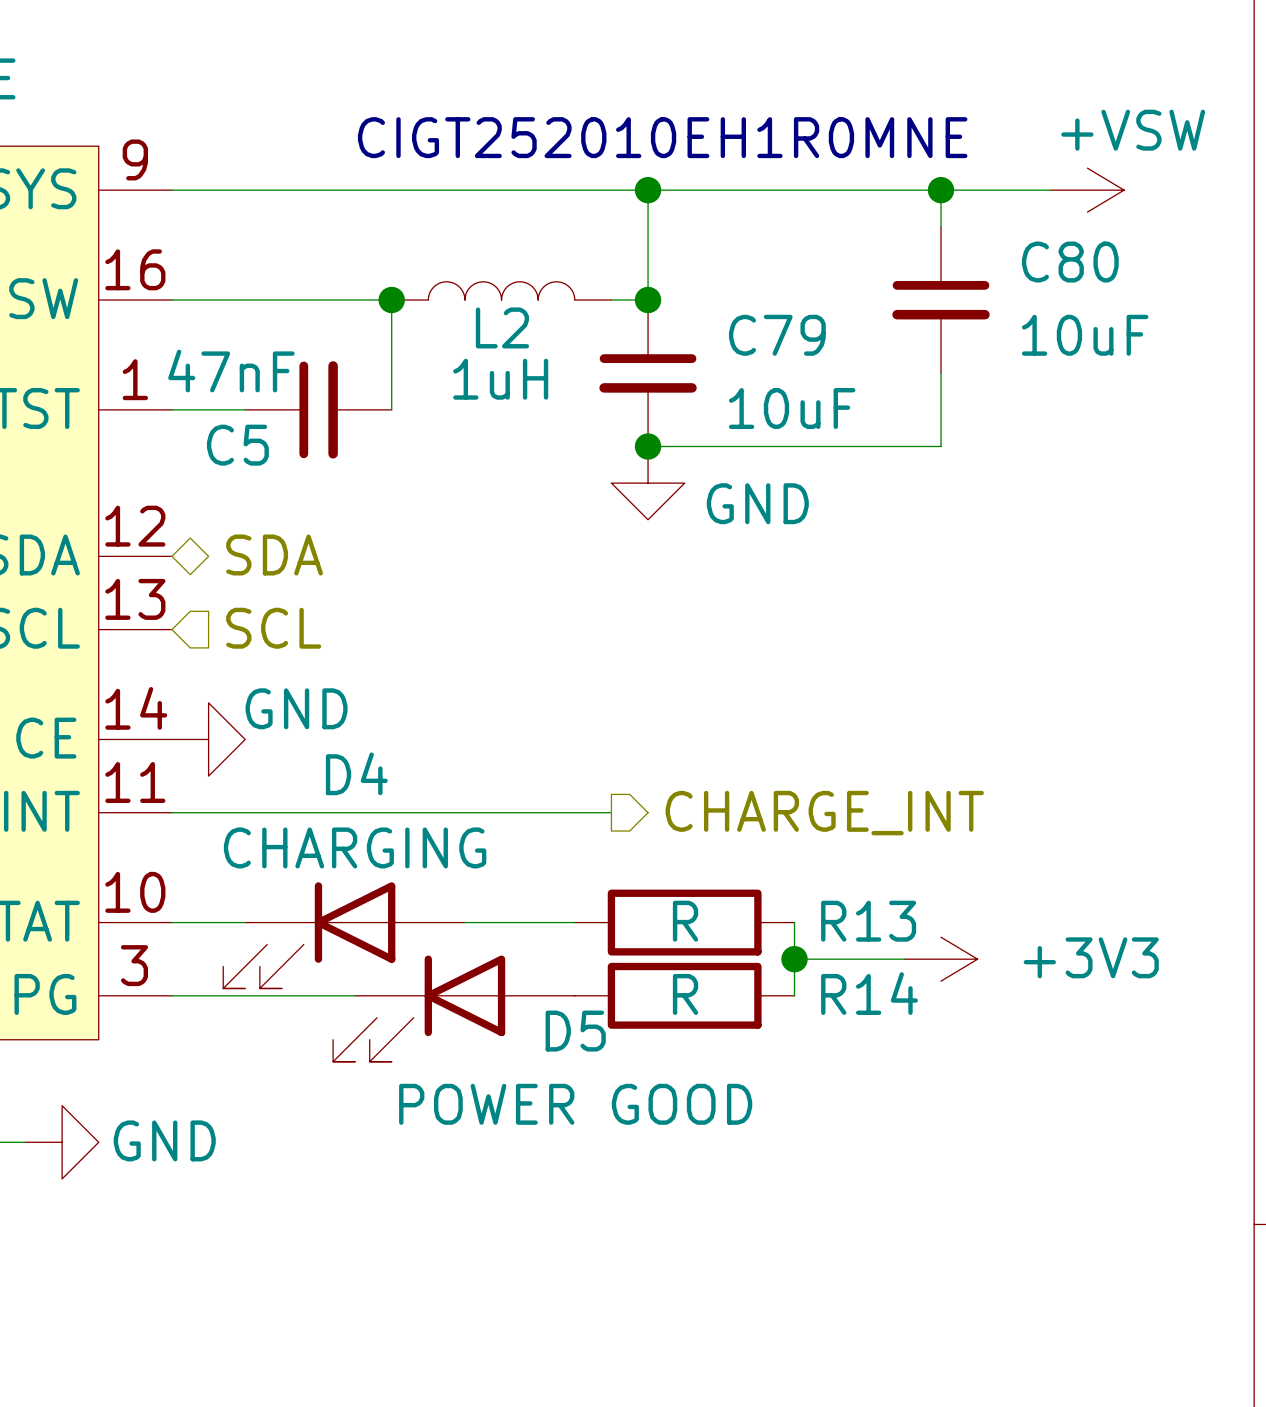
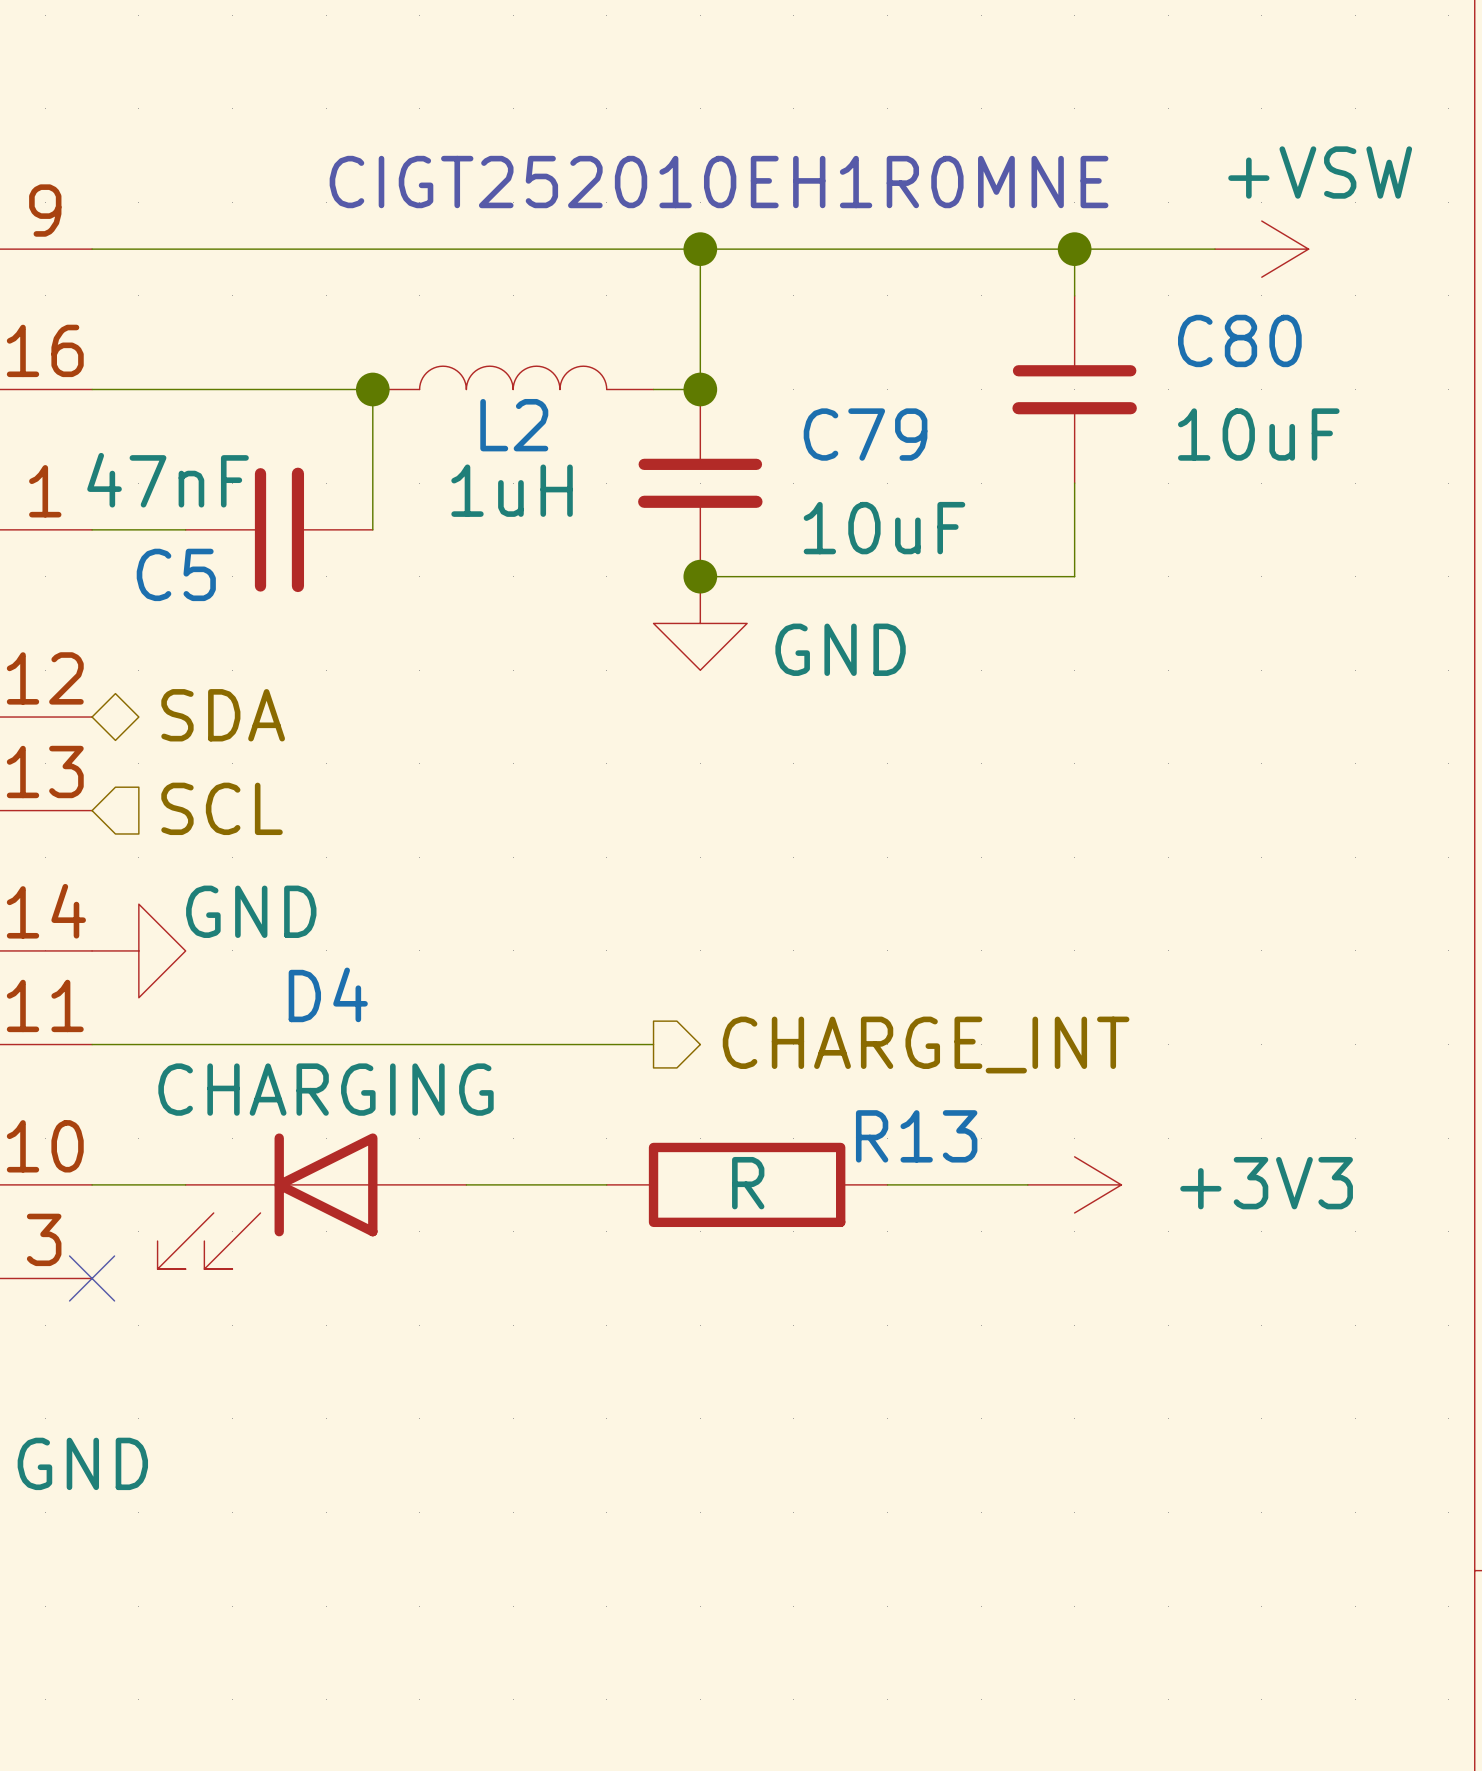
R13 name position: R13 (868, 921) -> R13 (916, 1136)
wire: (794, 922) (794, 995) -> (887, 1184) (1027, 1184)
wire: (794, 959) (904, 959) -> none
junction: (794, 959) -> none
power symbol position: +3V3 (941, 959) -> +3V3 (1074, 1184)
wire: (171, 995) (355, 995) -> none
no-connect mark: none -> (92, 1278)
R14: R (684, 995) -> none
D5: POWER GOOD (453, 1008) -> none

